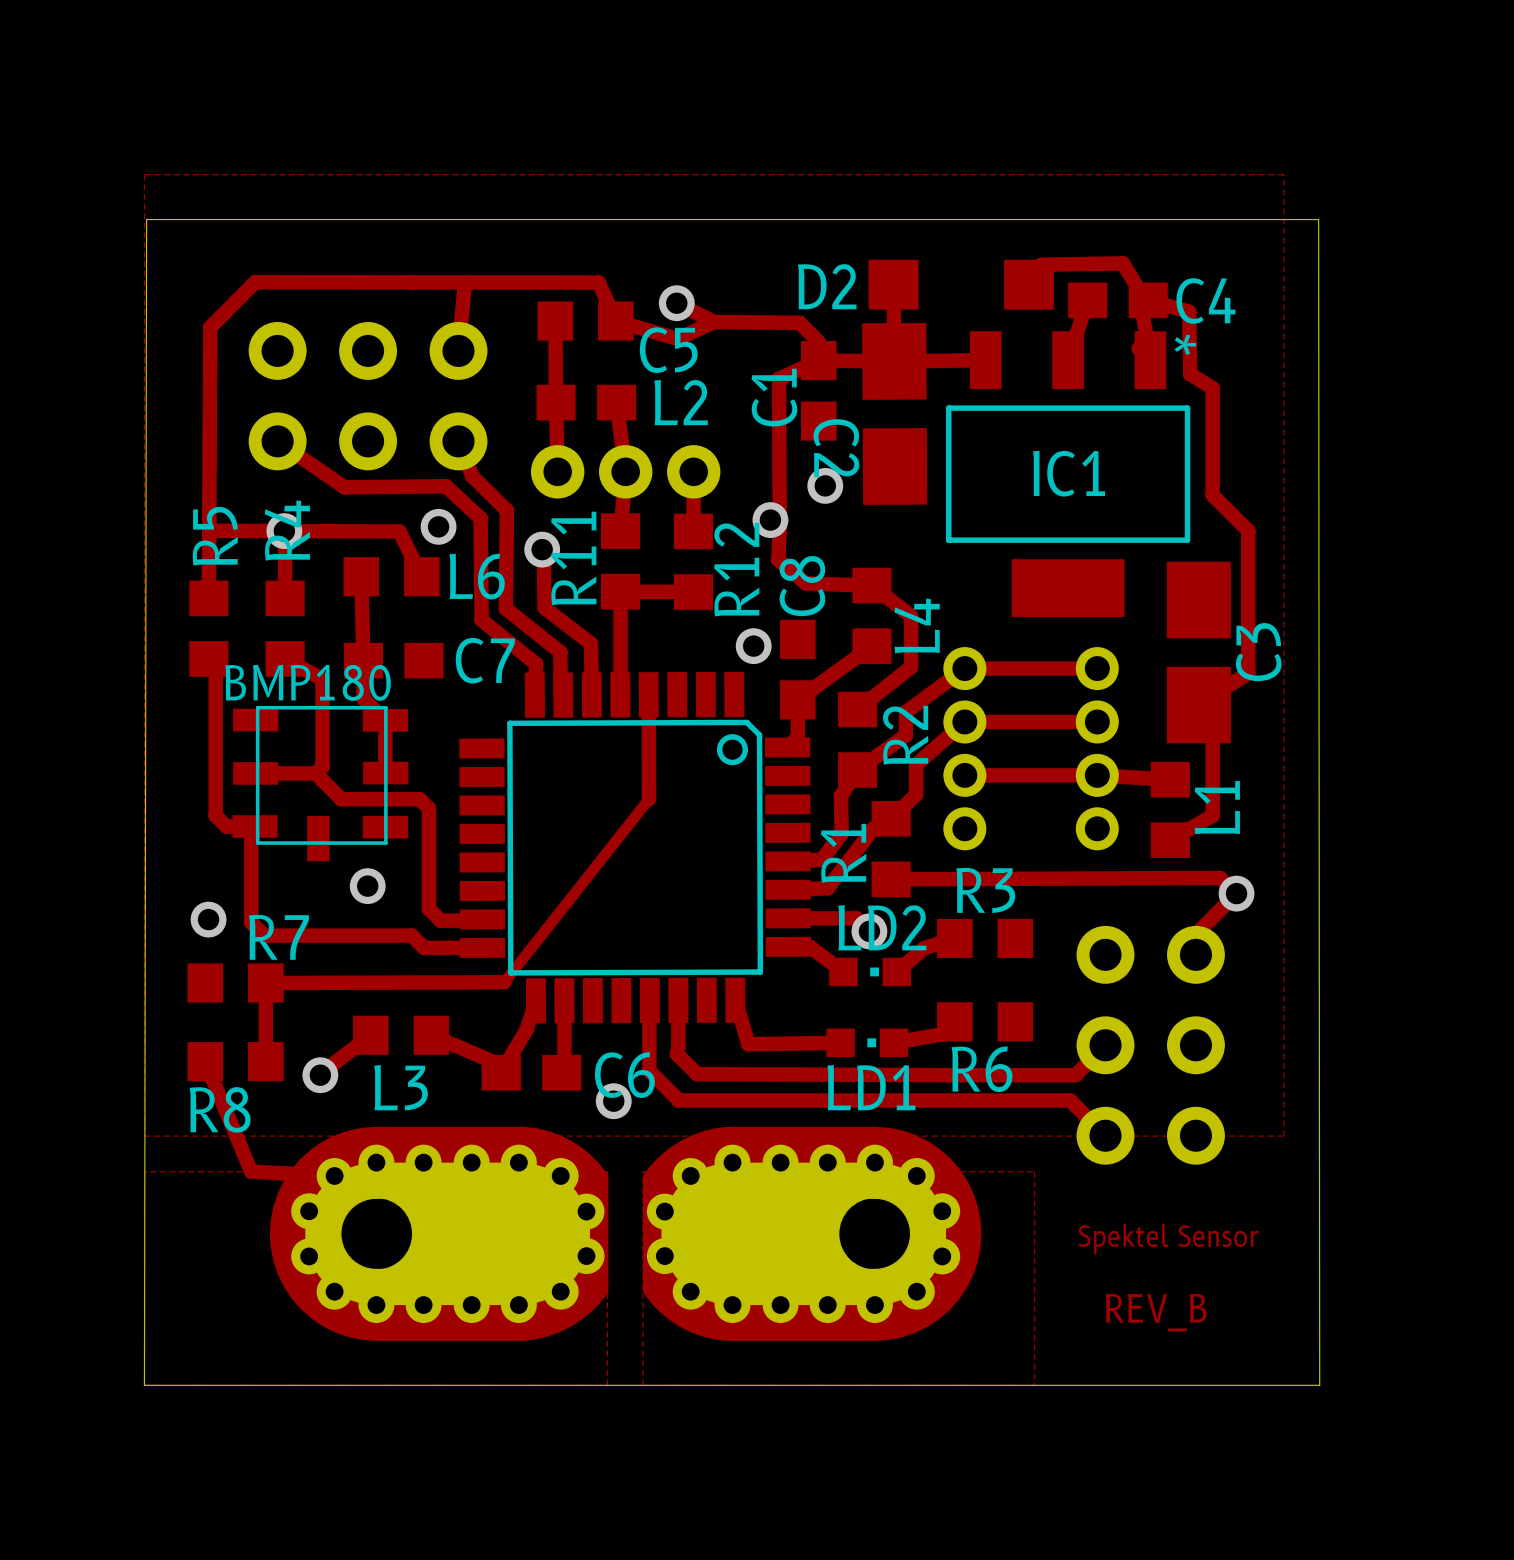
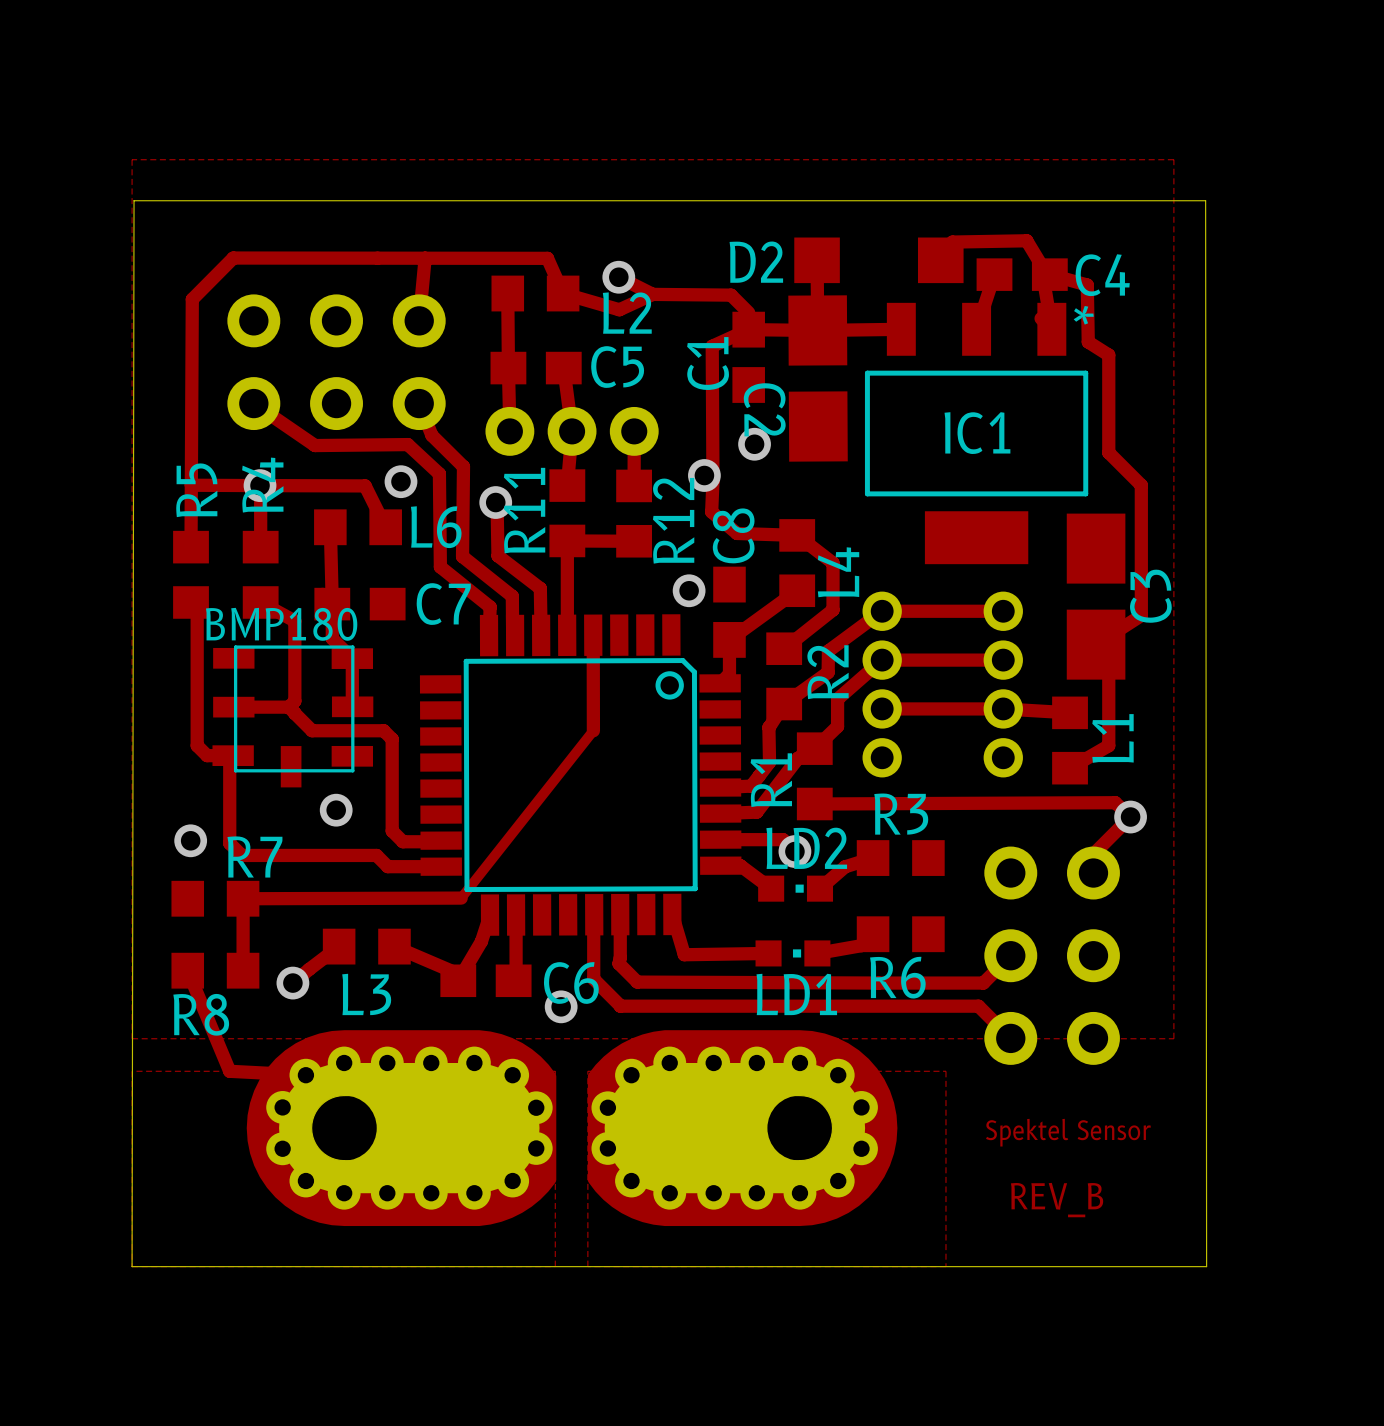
C5 name position: C5 (668, 350) -> C5 (617, 367)
L2 name position: L2 (681, 402) -> L2 (627, 313)

